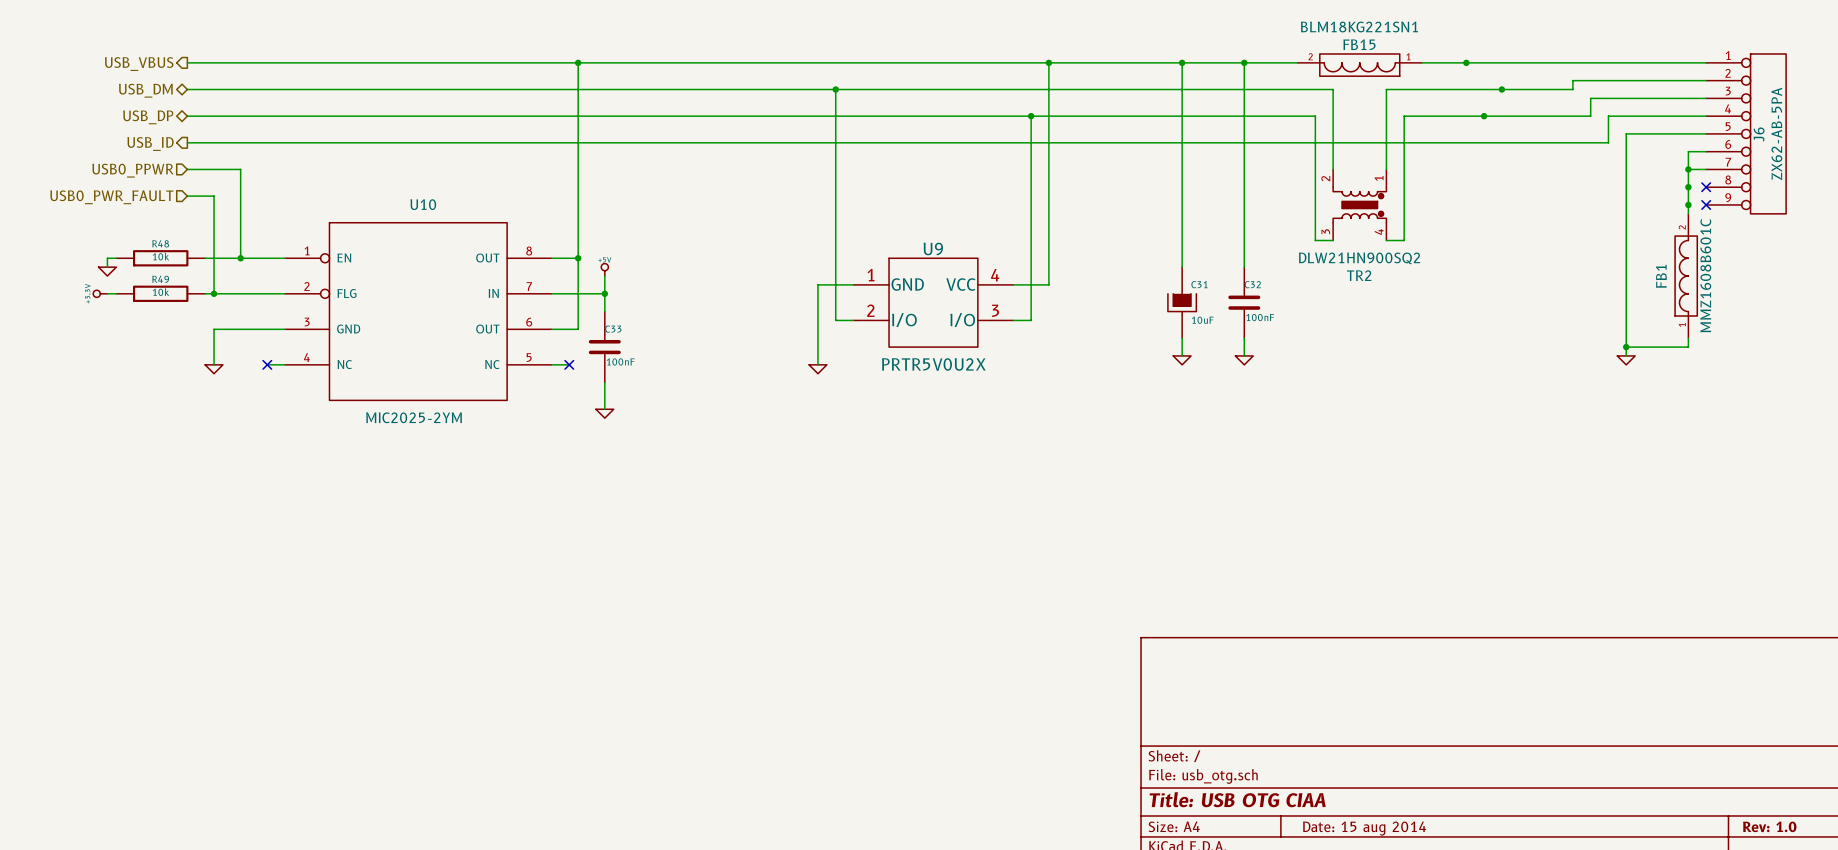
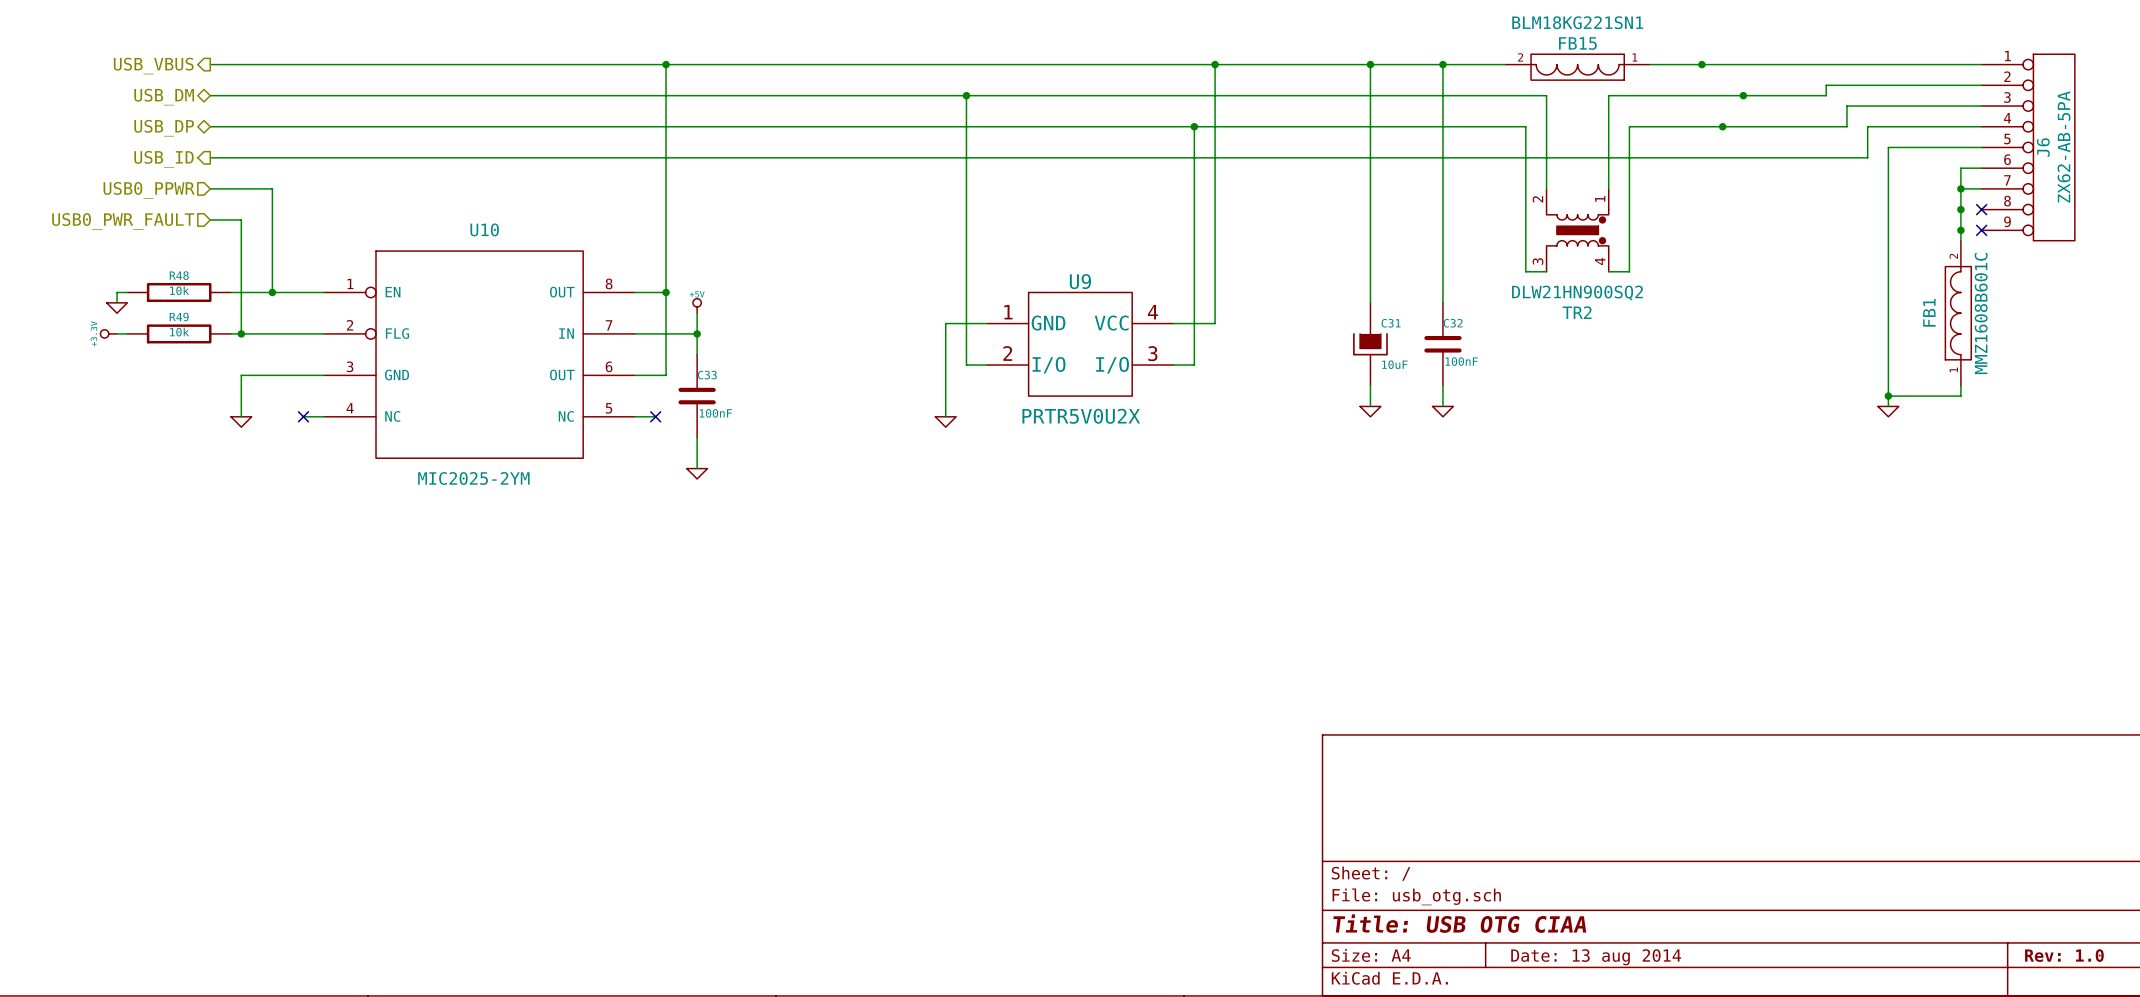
title block: Date: 15 aug 2014 (1364, 828) -> Date: 13 aug 2014 (1596, 957)

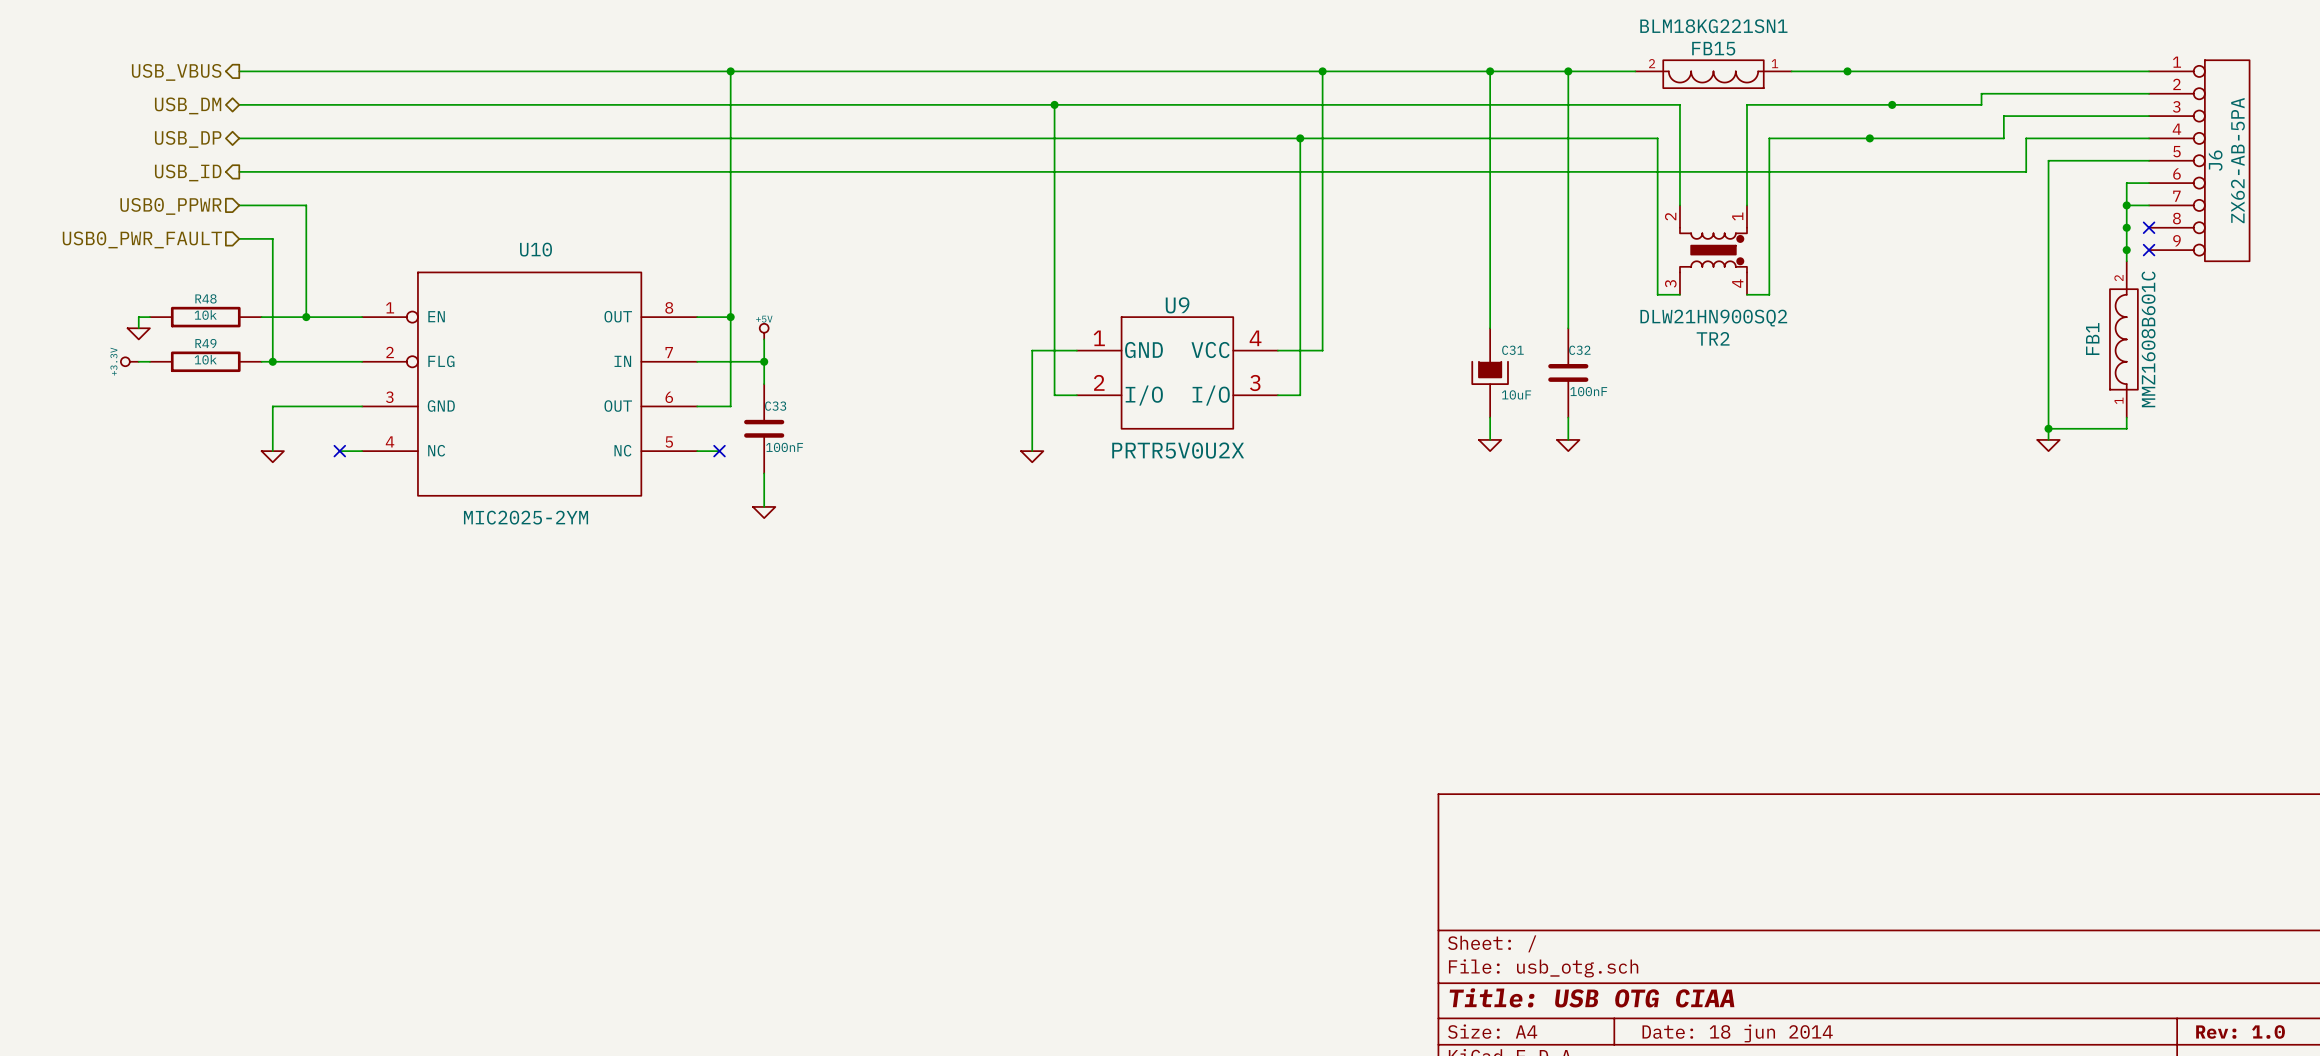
title block: Date: 13 aug 2014 (1596, 957) -> Date: 18 jun 2014 (1737, 1033)

